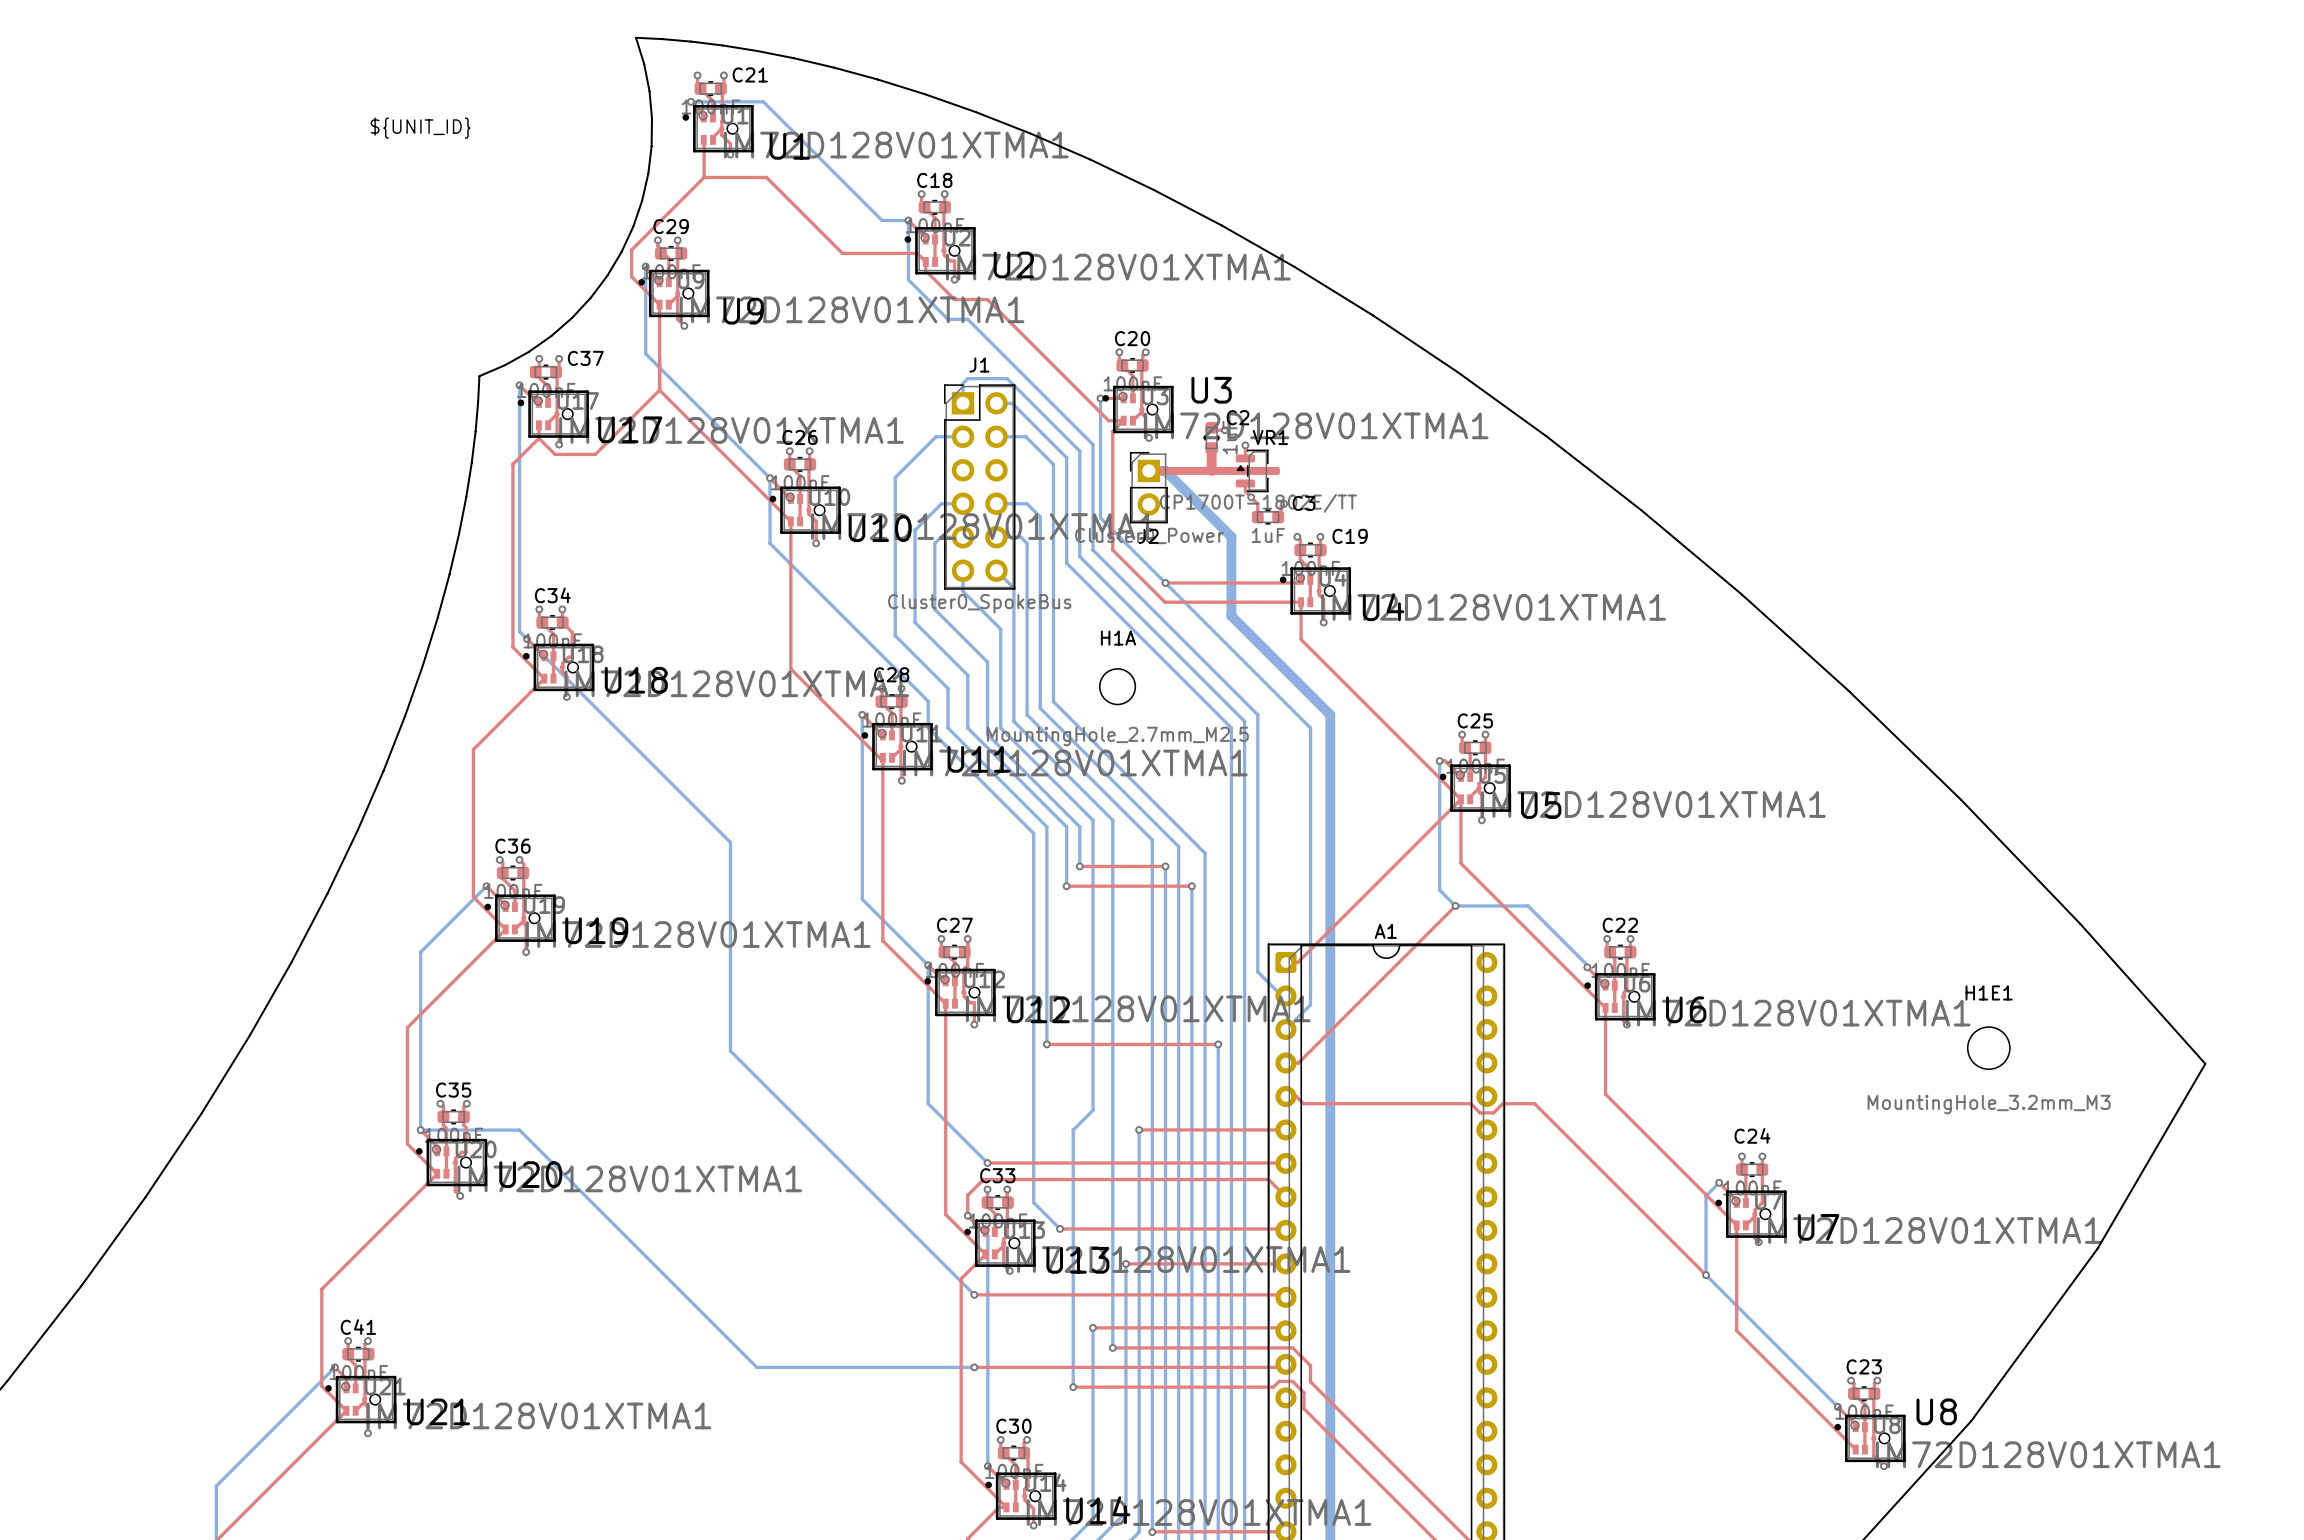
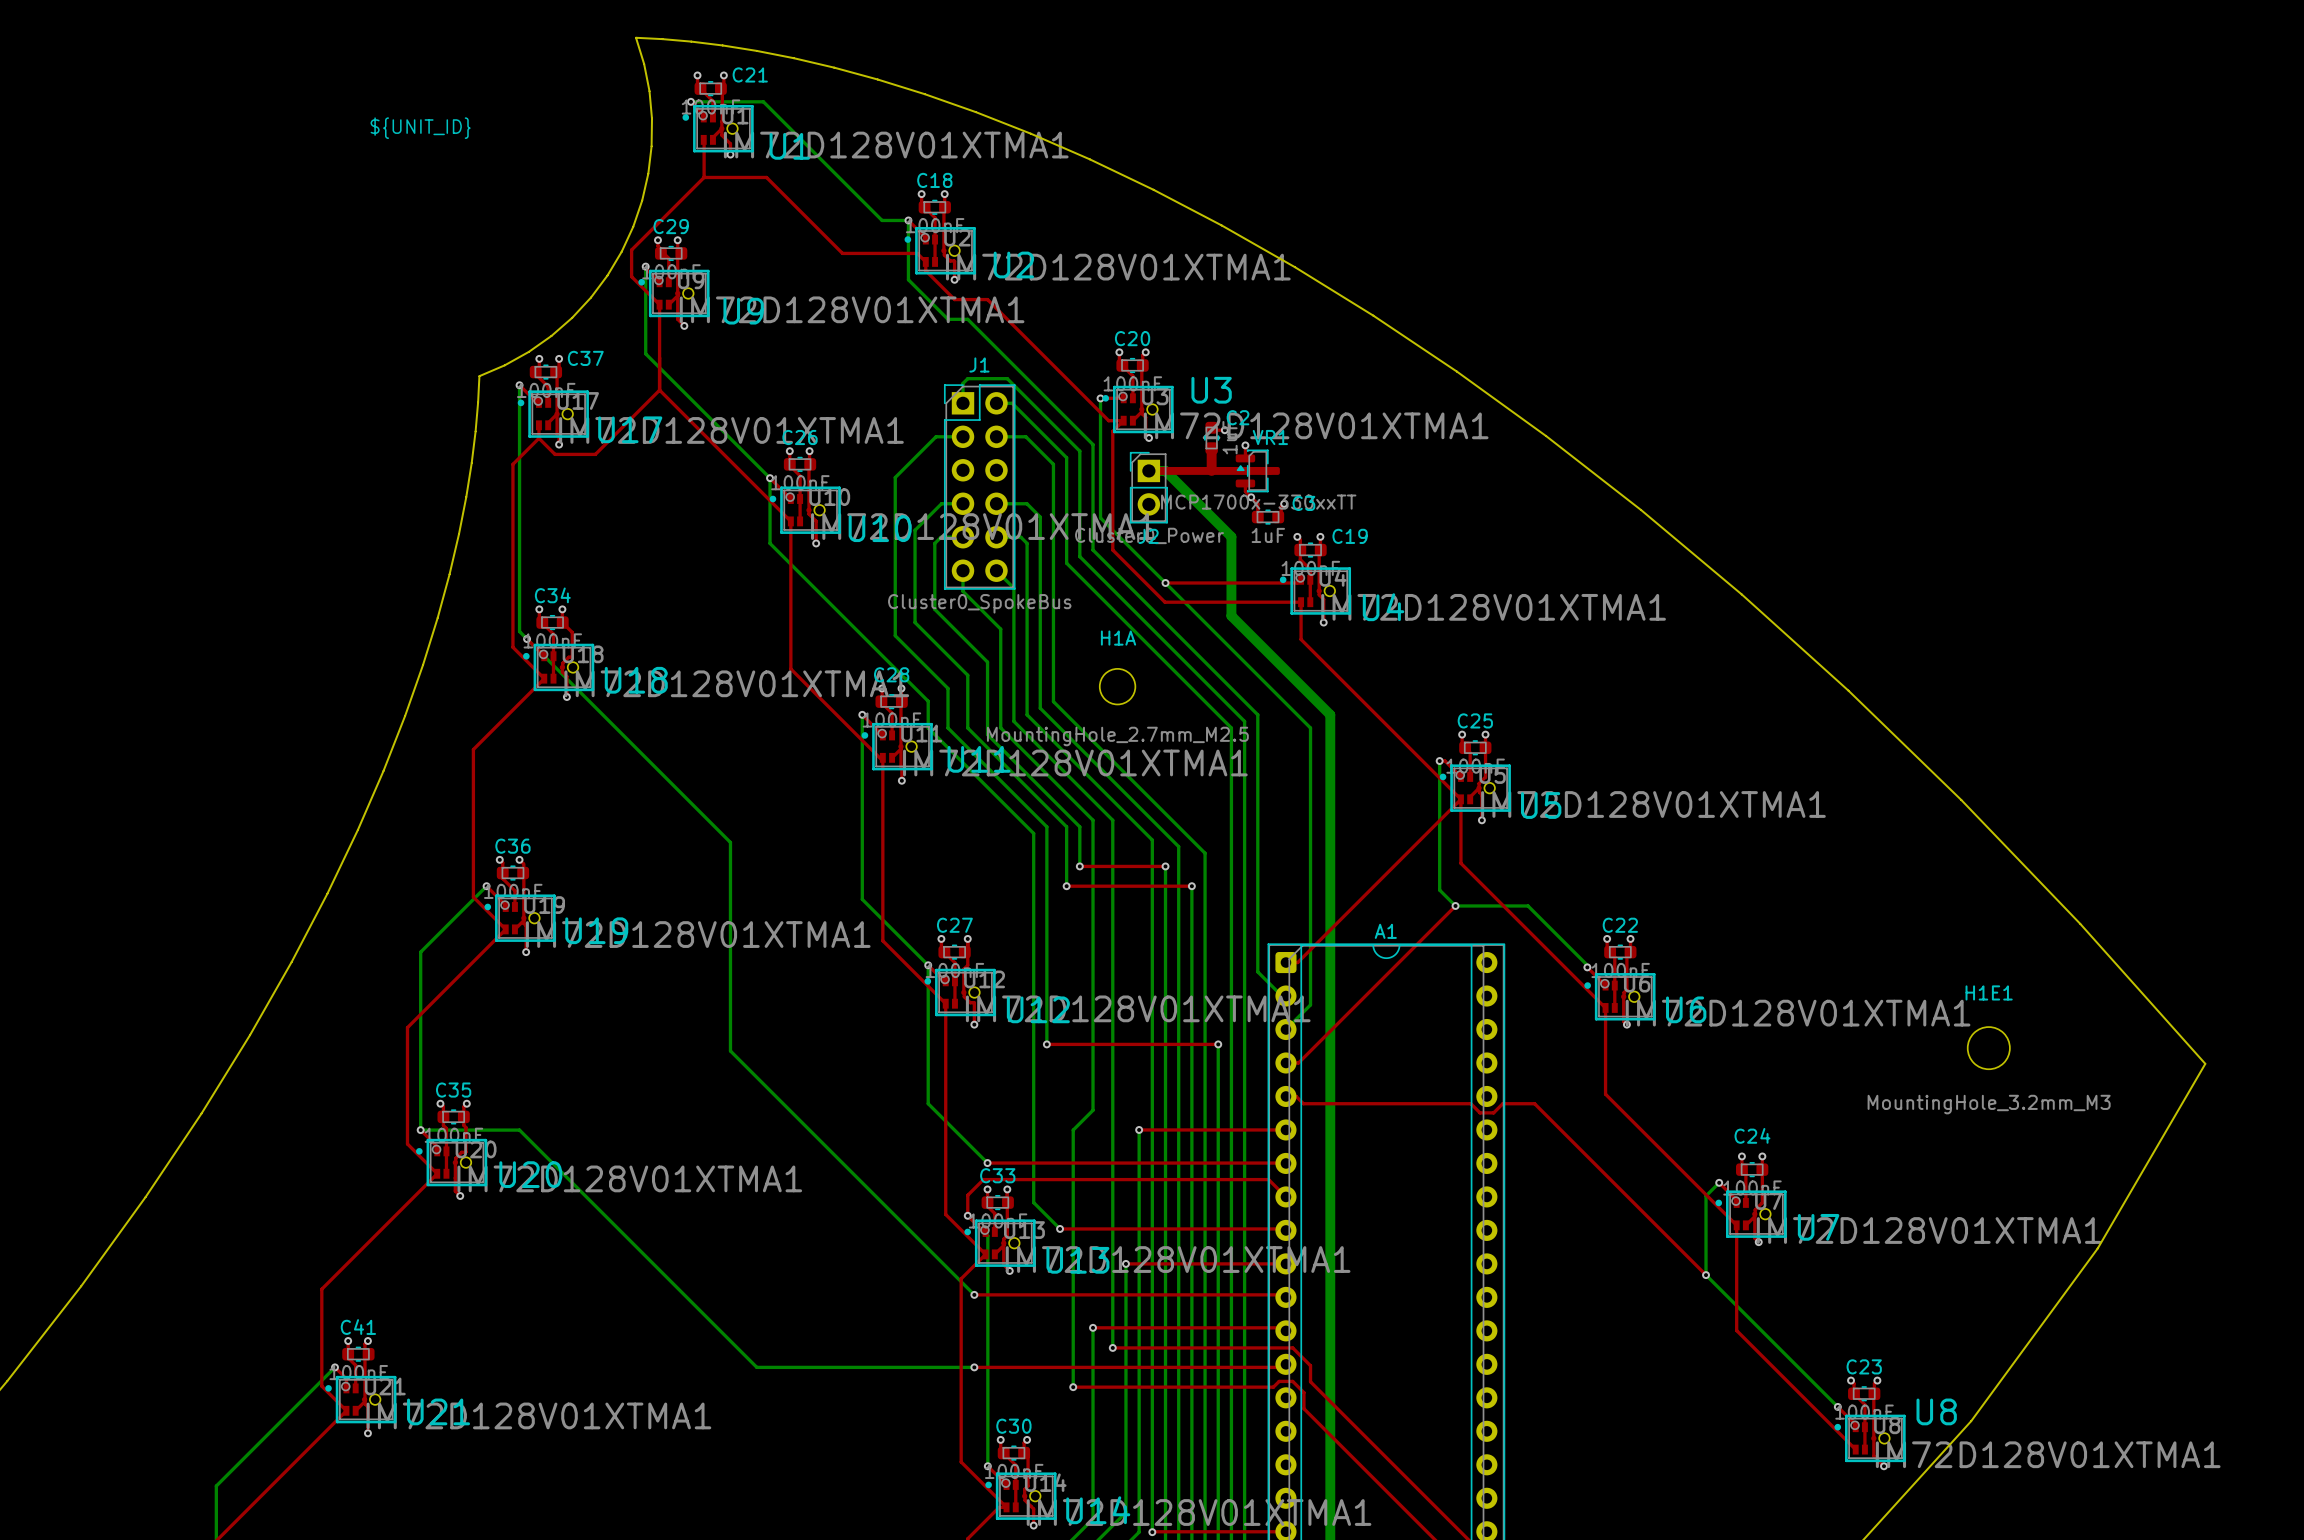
VR1 value: CP1700T-1802E/TT (1258, 503) -> MCP1700x-330xxTT (1258, 502)

